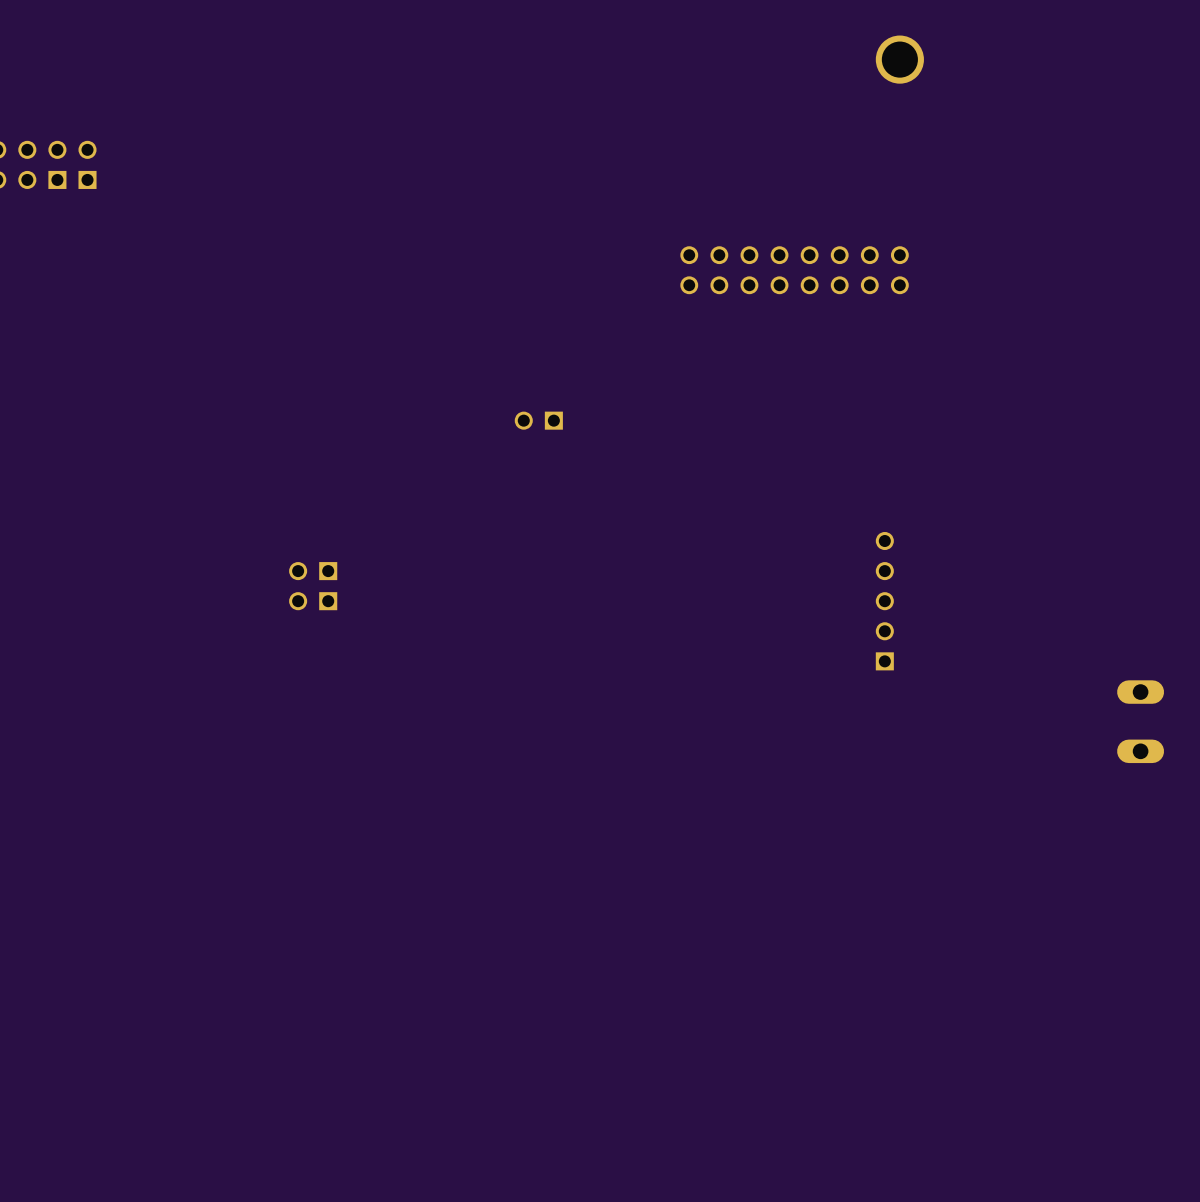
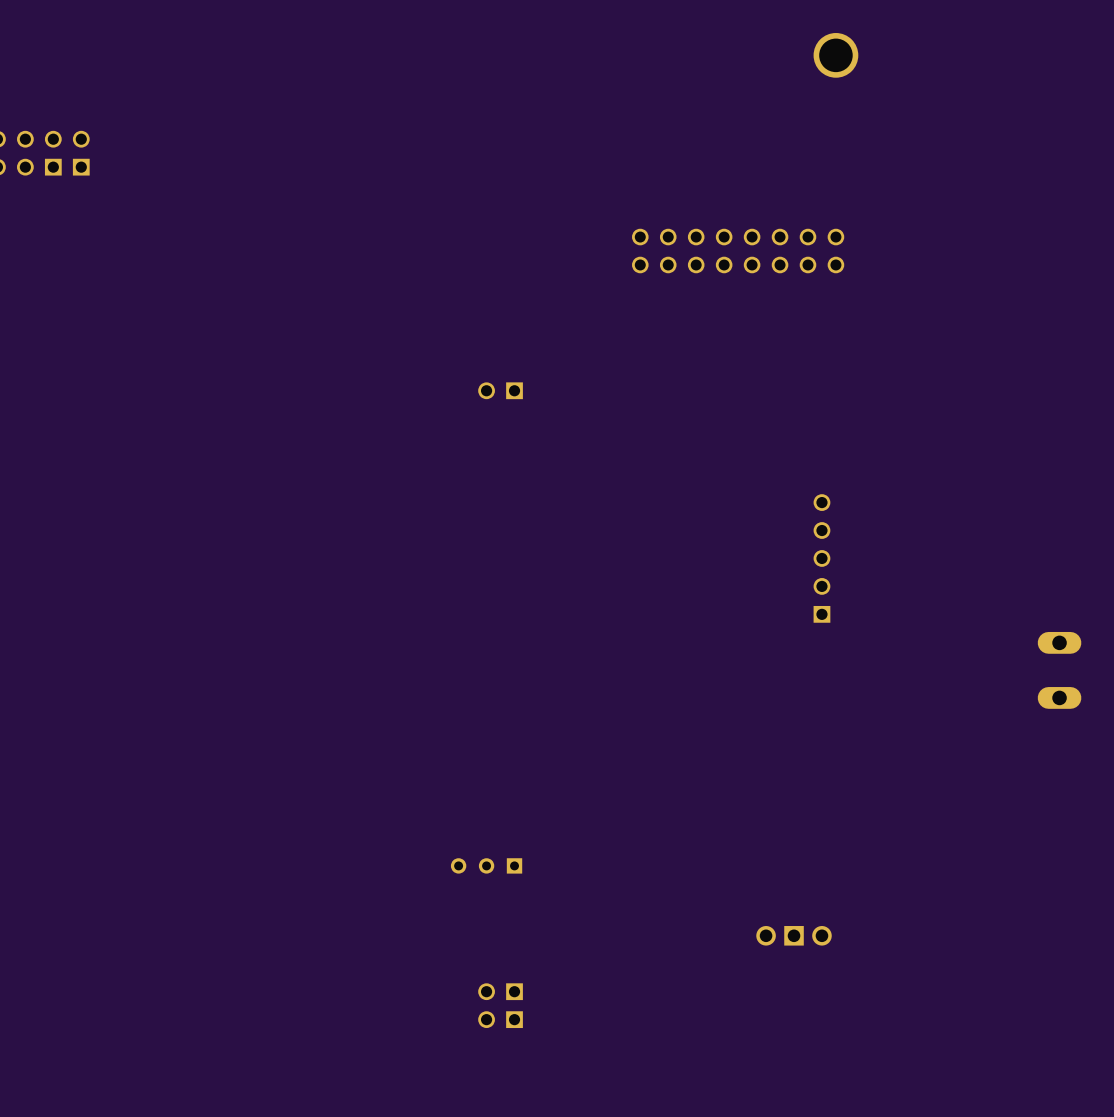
part: (313, 571) -> none
part: (313, 601) -> none
part: none -> (486, 865)
part: none -> (794, 935)
part: none -> (500, 991)
part: none -> (500, 1019)

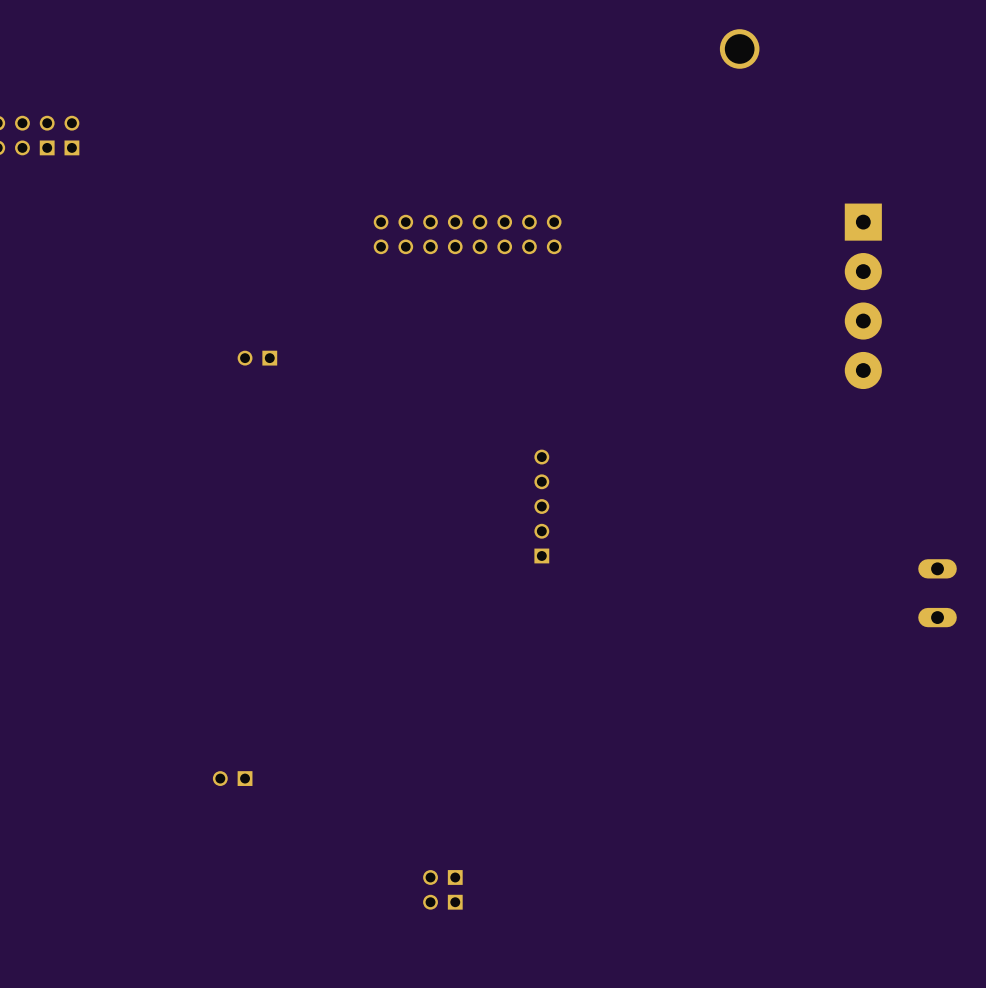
part position: (738, 251) -> (467, 234)
part: none -> (863, 296)
part position: (500, 390) -> (257, 358)
part position: (821, 558) -> (541, 506)
part: (486, 865) -> none
part: none -> (232, 778)
part: (794, 935) -> none

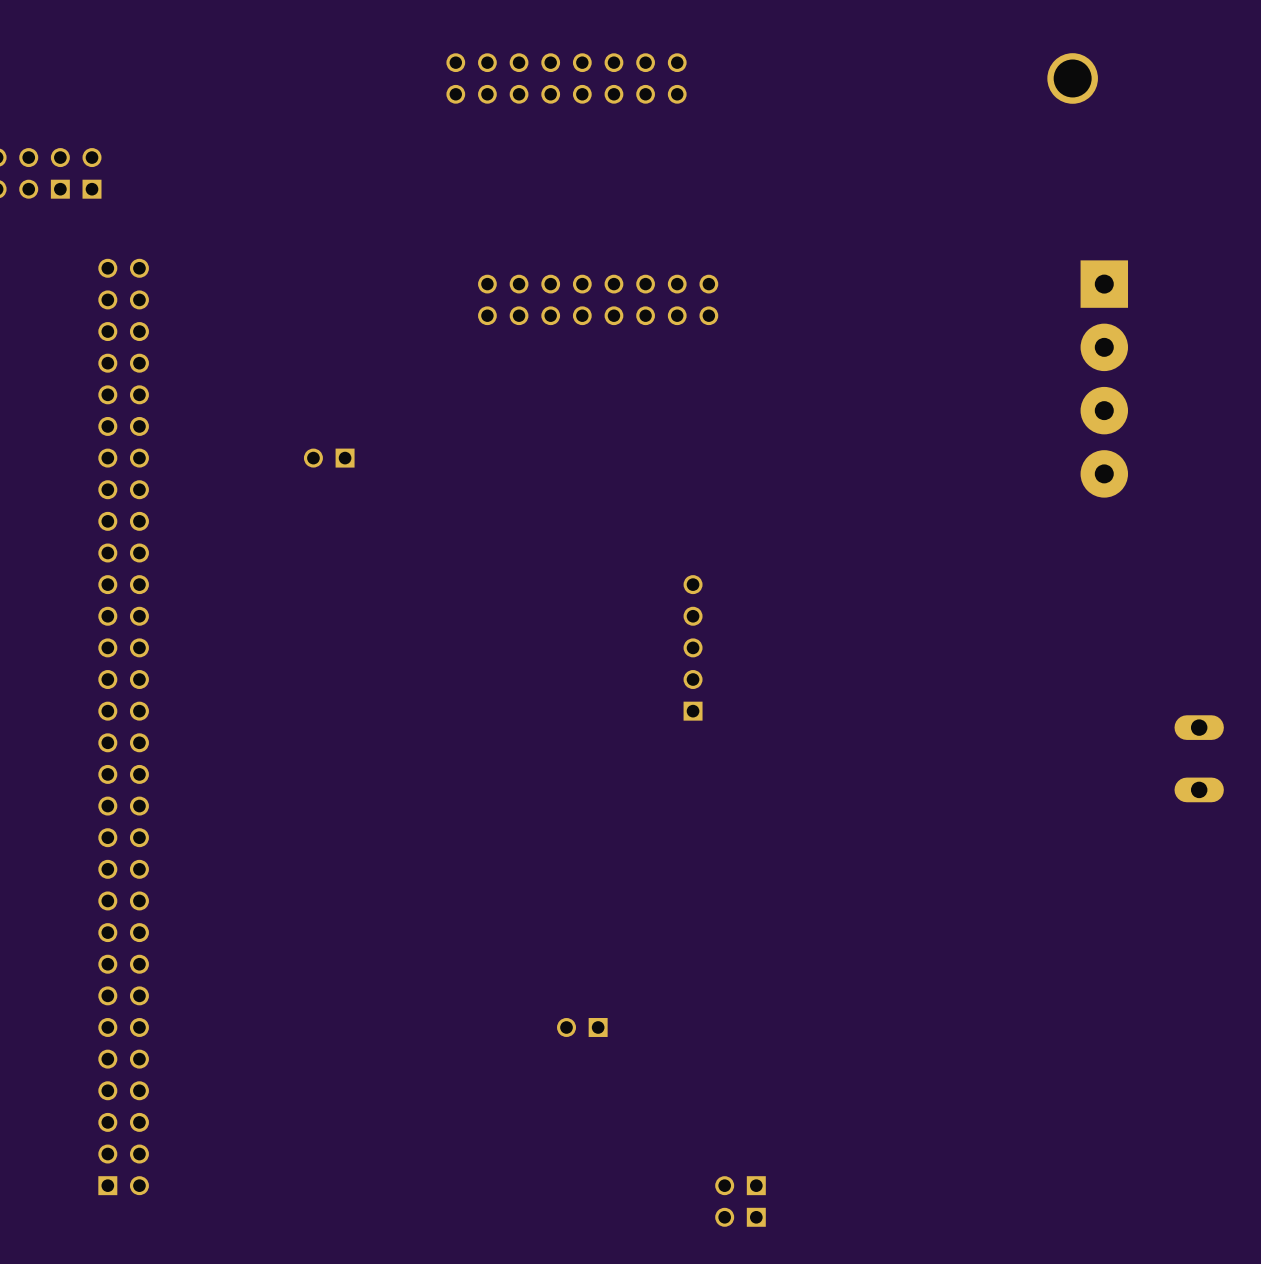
part position: (739, 48) -> (1072, 78)
part: none -> (566, 78)
part: none -> (123, 726)
part: (232, 778) -> none
part: none -> (582, 1027)
part: (442, 877) -> none
part: (442, 902) -> none
part: none -> (740, 1185)
part: none -> (740, 1217)

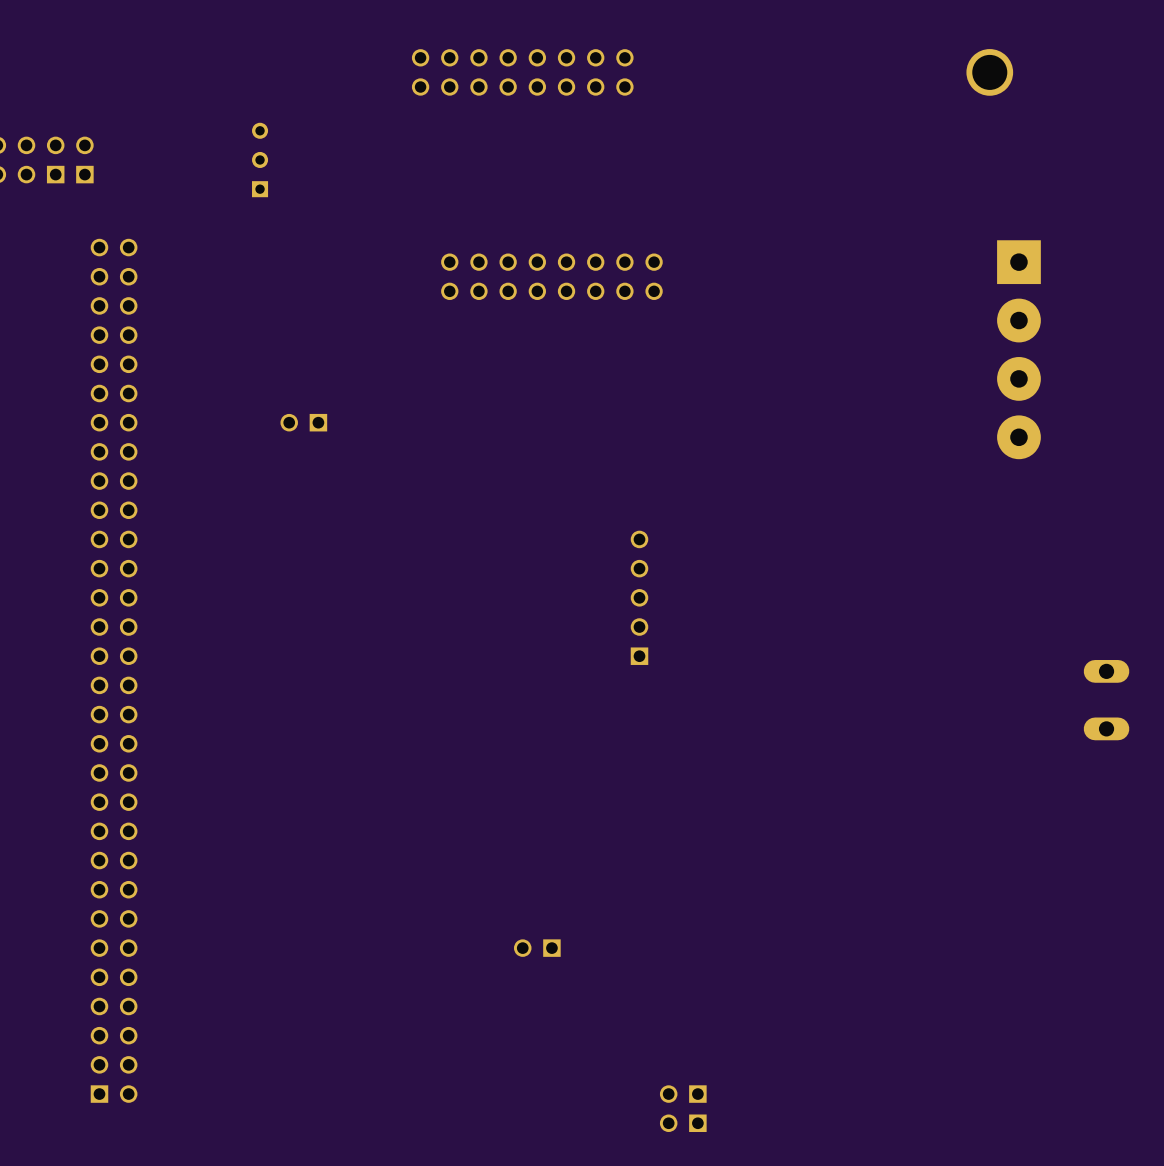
part: none -> (260, 159)

